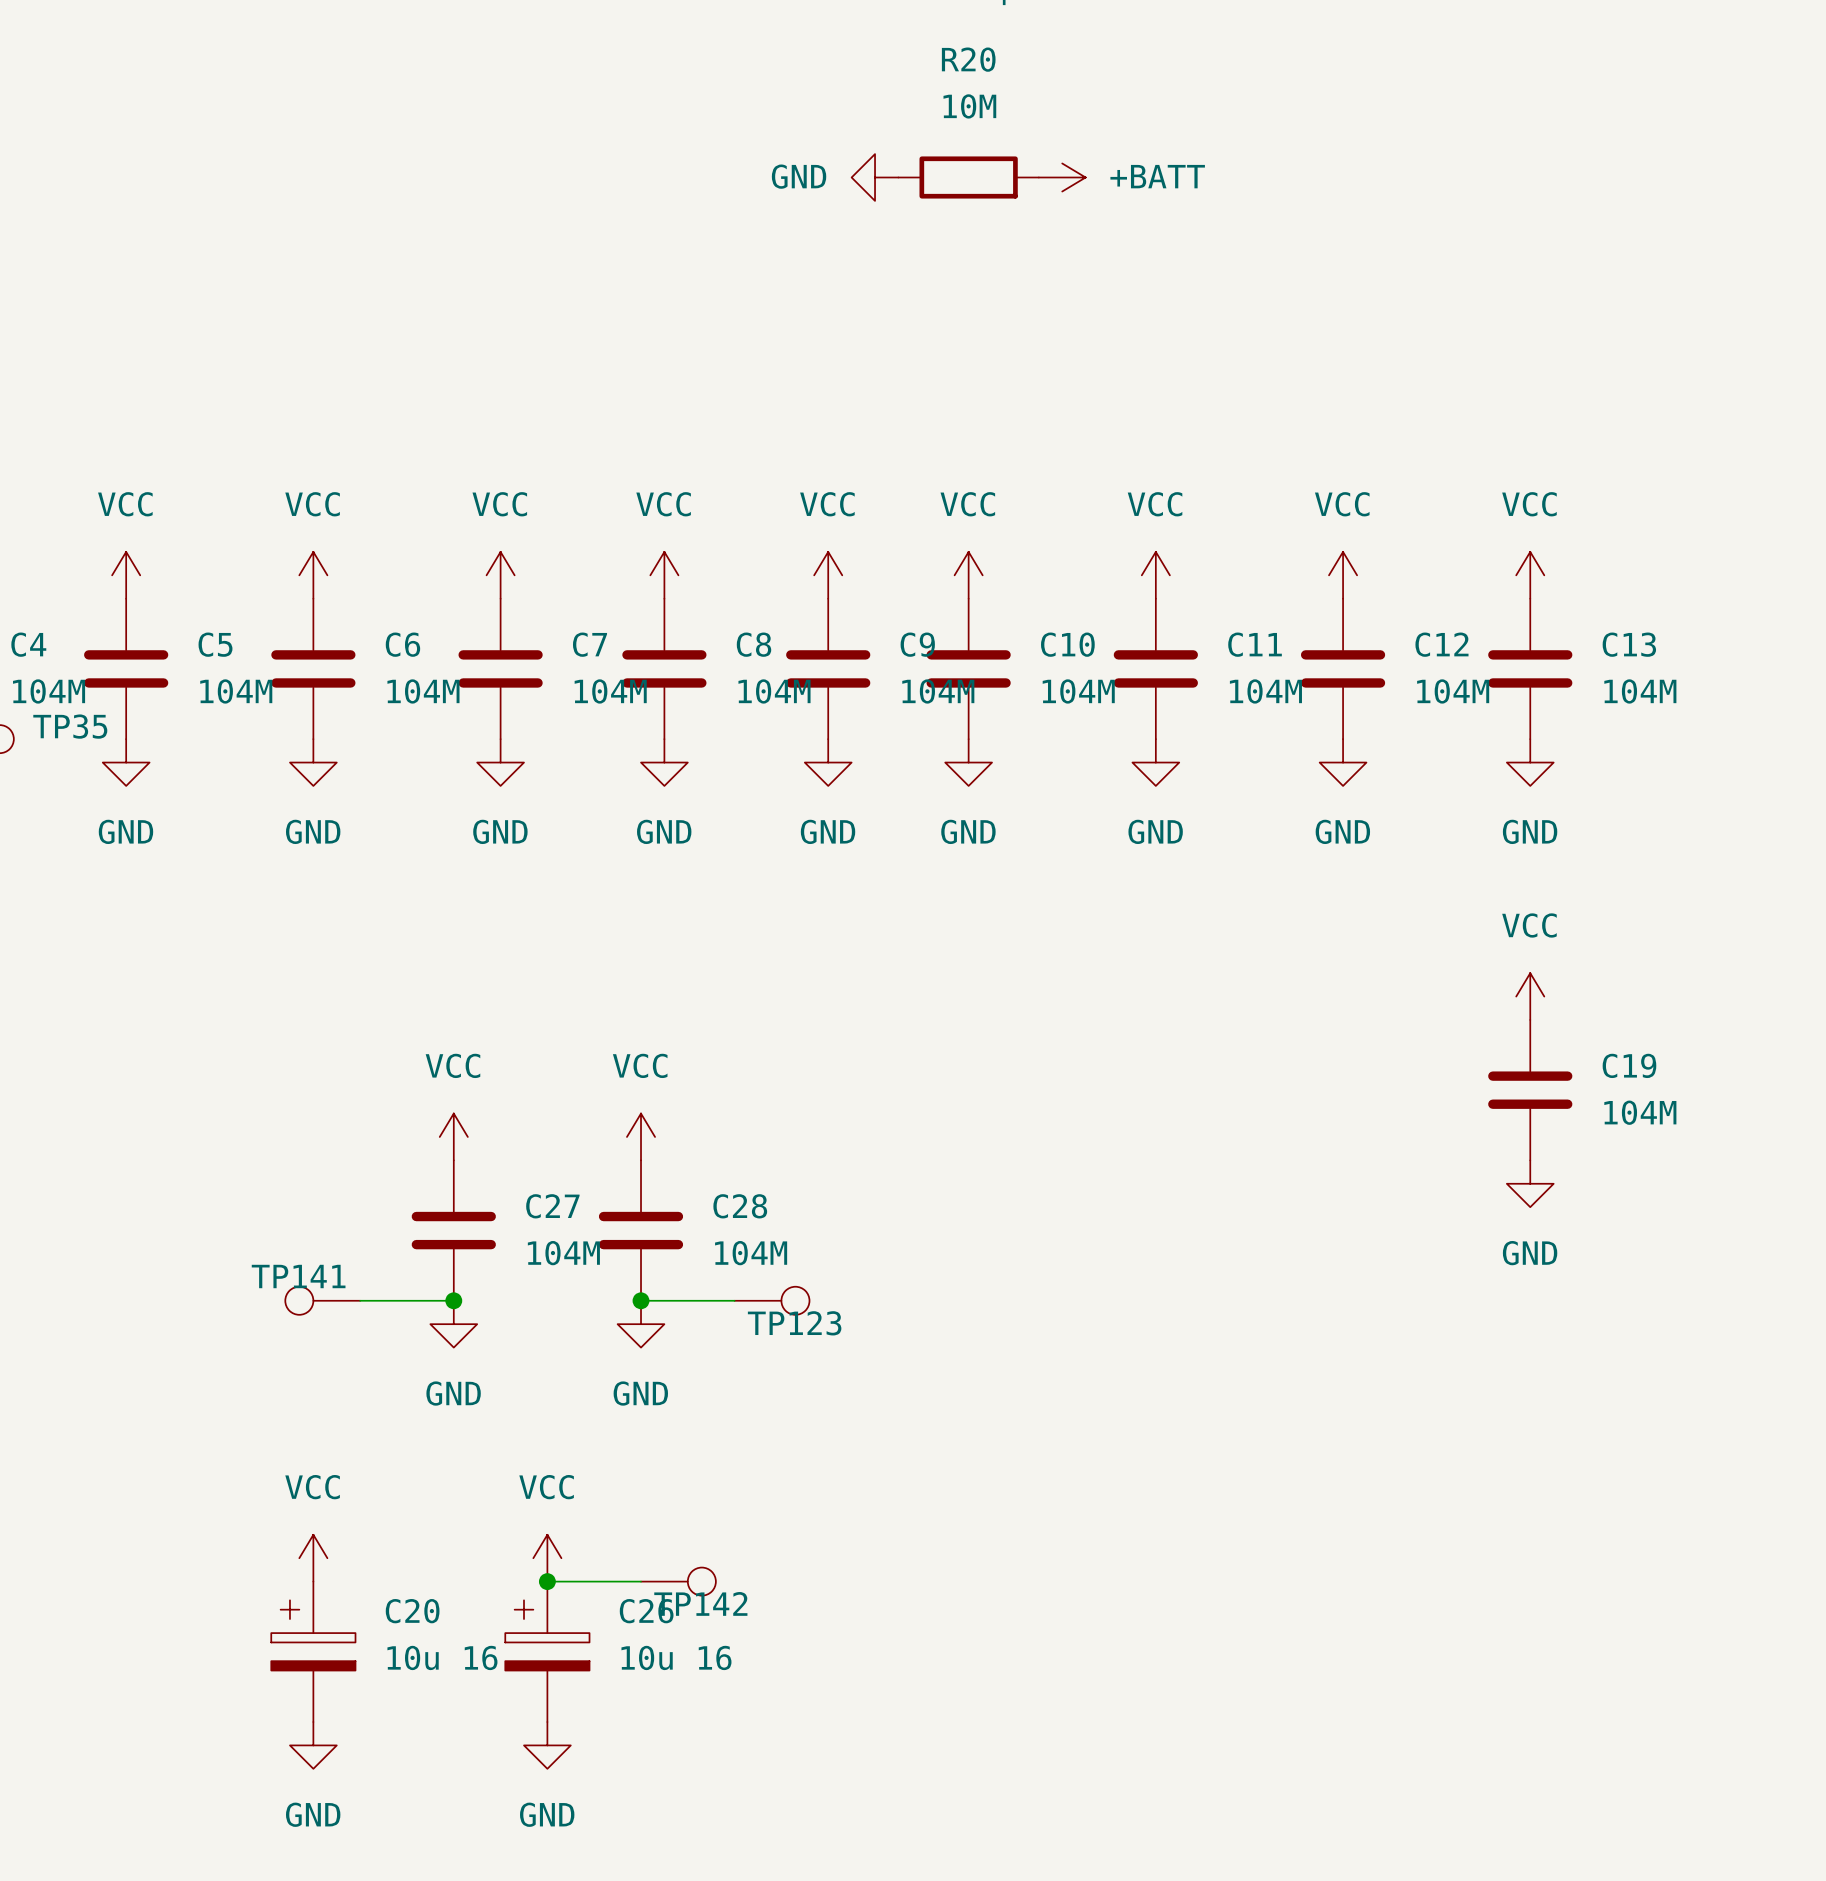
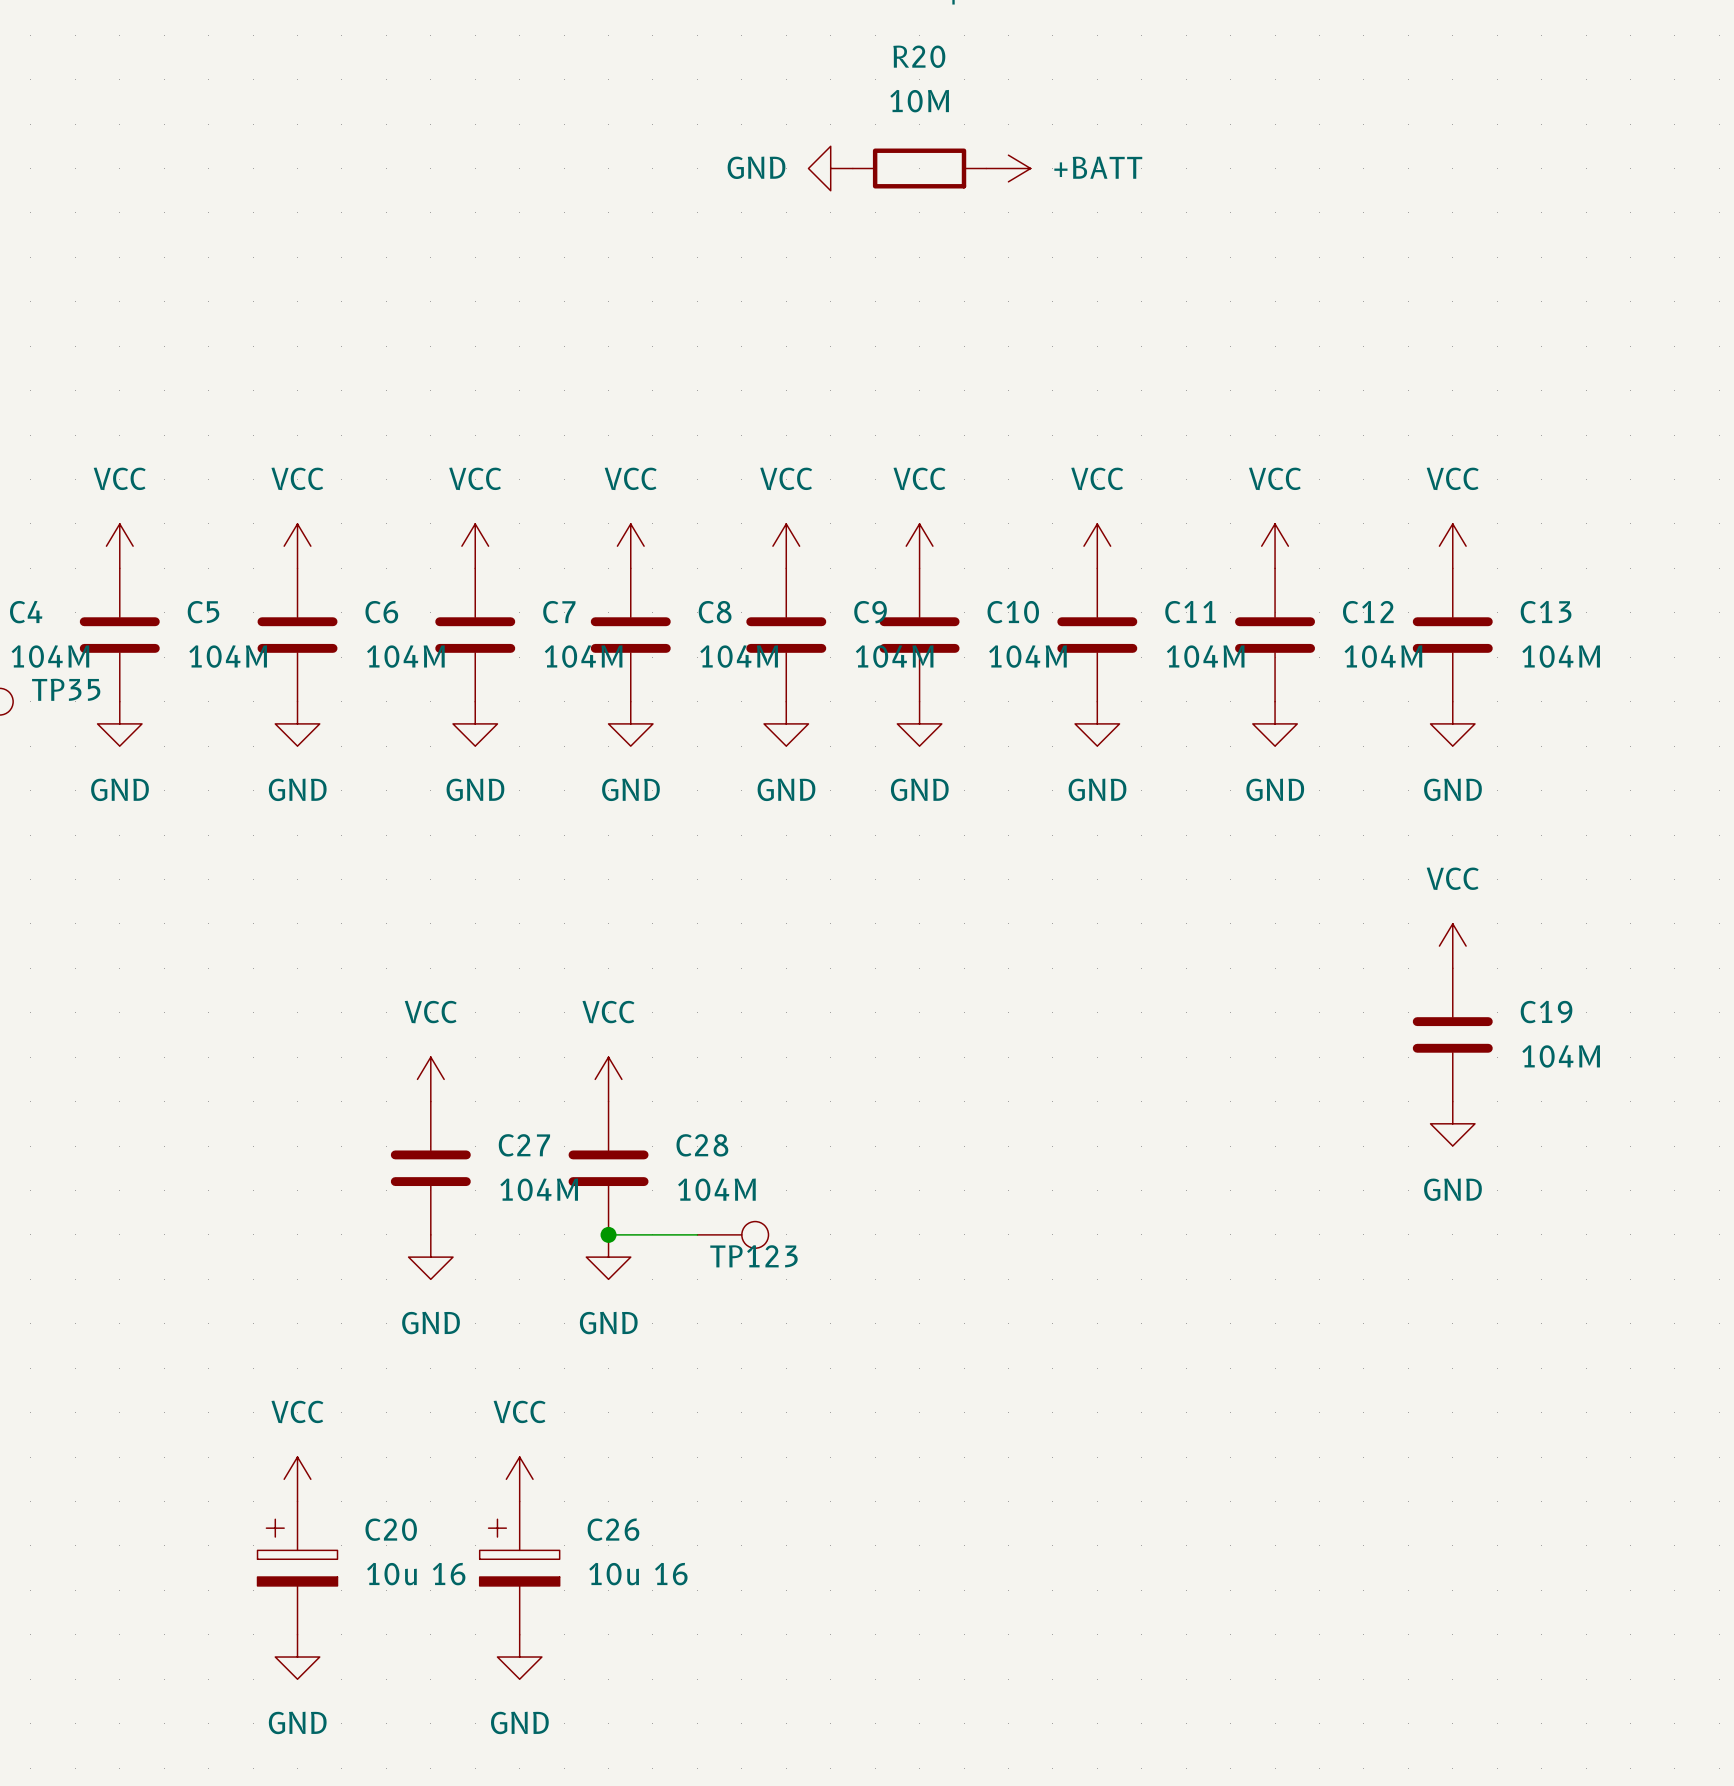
TP141: (322, 1300) -> none
wire: (360, 1300) (453, 1300) -> none
junction: (453, 1300) -> none
wire: (547, 1581) (641, 1581) -> none
junction: (547, 1581) -> none
TP142: (678, 1581) -> none

